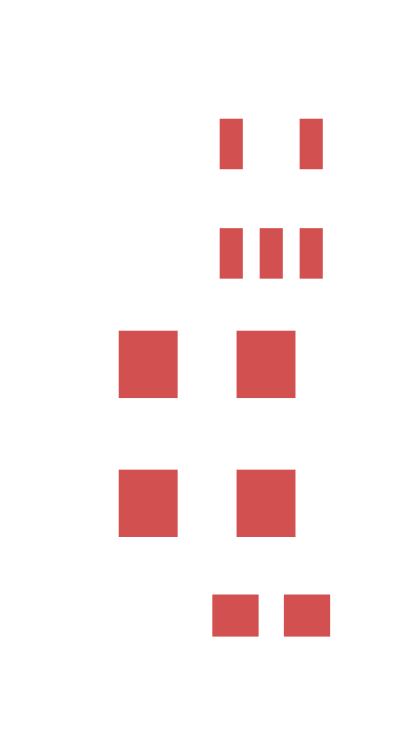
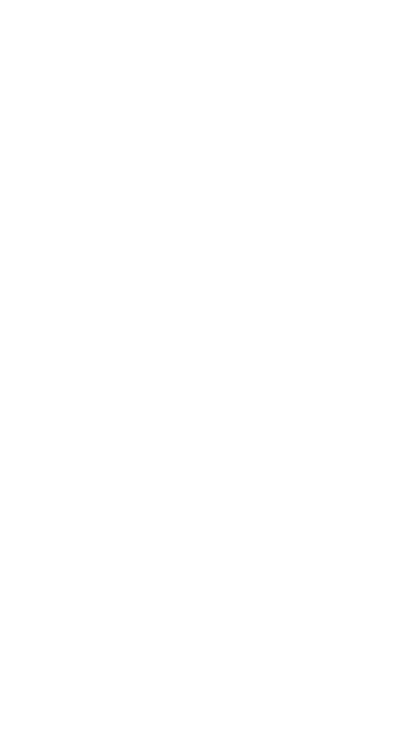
part: (271, 198) -> none
part: (207, 364) -> none
part: (207, 503) -> none
part: (271, 615) -> none

